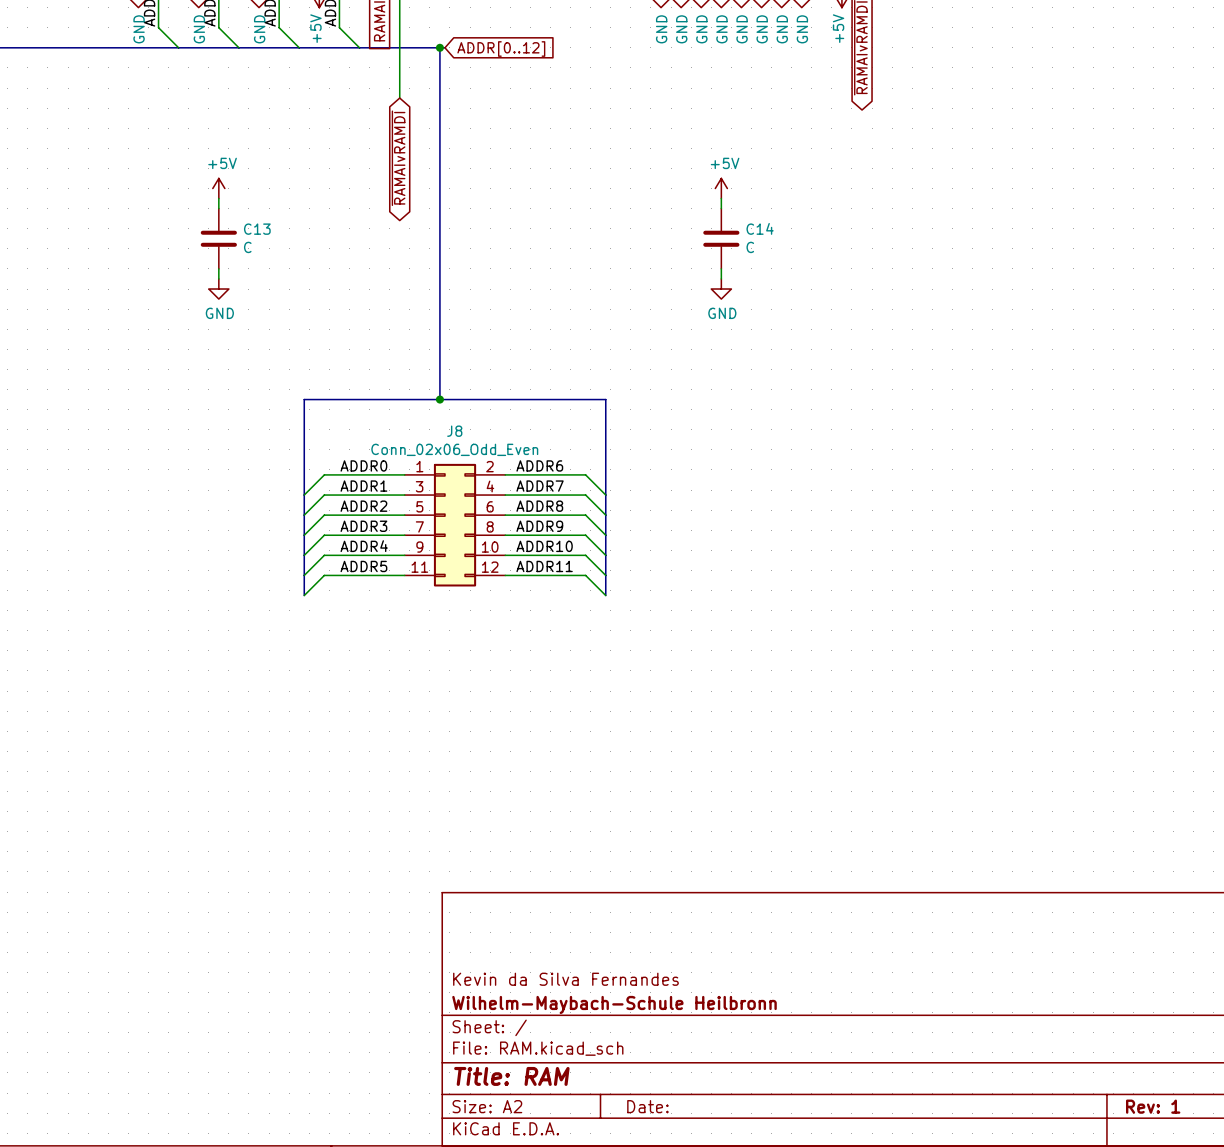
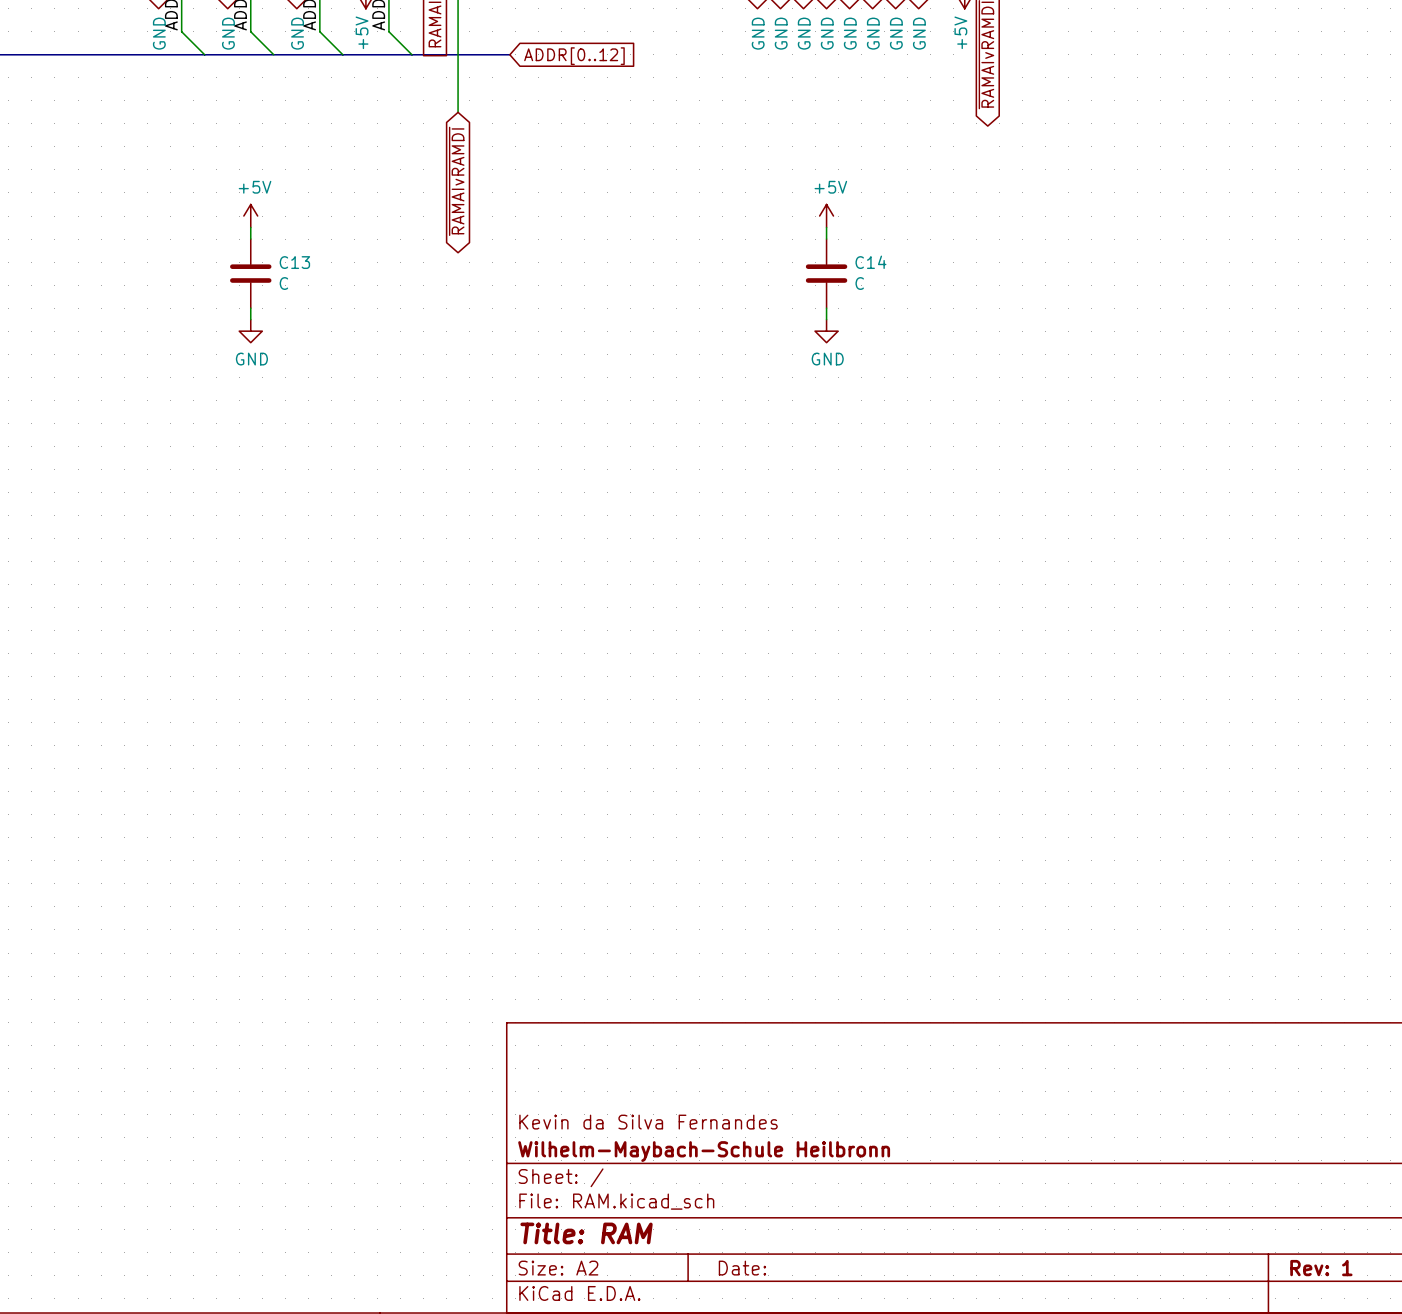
bus: (439, 47) (439, 399) -> none
junction: (439, 47) -> none
junction: (439, 399) -> none
label: ADDR0 (363, 465) -> none
label: ADDR6 (539, 465) -> none
wire: (404, 474) (324, 474) (304, 495) -> none
wire: (505, 474) (585, 474) (605, 495) -> none
label: ADDR1 (363, 486) -> none
label: ADDR7 (540, 486) -> none
wire: (404, 495) (324, 495) (304, 515) -> none
wire: (505, 495) (585, 495) (605, 515) -> none
label: ADDR2 (363, 506) -> none
label: ADDR8 (539, 506) -> none
wire: (324, 515) (304, 535) -> none
wire: (324, 515) (404, 515) -> none
wire: (505, 515) (585, 515) (605, 535) -> none
J8: Conn_02x06_Odd_Even (455, 525) -> none
label: ADDR3 (363, 526) -> none
label: ADDR9 (539, 526) -> none
wire: (404, 535) (324, 535) (304, 555) -> none
wire: (505, 535) (585, 535) (605, 555) -> none
label: ADDR4 (364, 546) -> none
label: ADDR10 (544, 546) -> none
wire: (404, 555) (324, 555) (304, 575) -> none
wire: (505, 555) (585, 555) (605, 575) -> none
label: ADDR5 (363, 566) -> none
label: ADDR11 (544, 566) -> none
wire: (324, 575) (304, 595) -> none
wire: (324, 575) (404, 575) -> none
wire: (505, 575) (585, 575) (605, 595) -> none
bus: (304, 595) (304, 399) (605, 399) (605, 595) -> none

